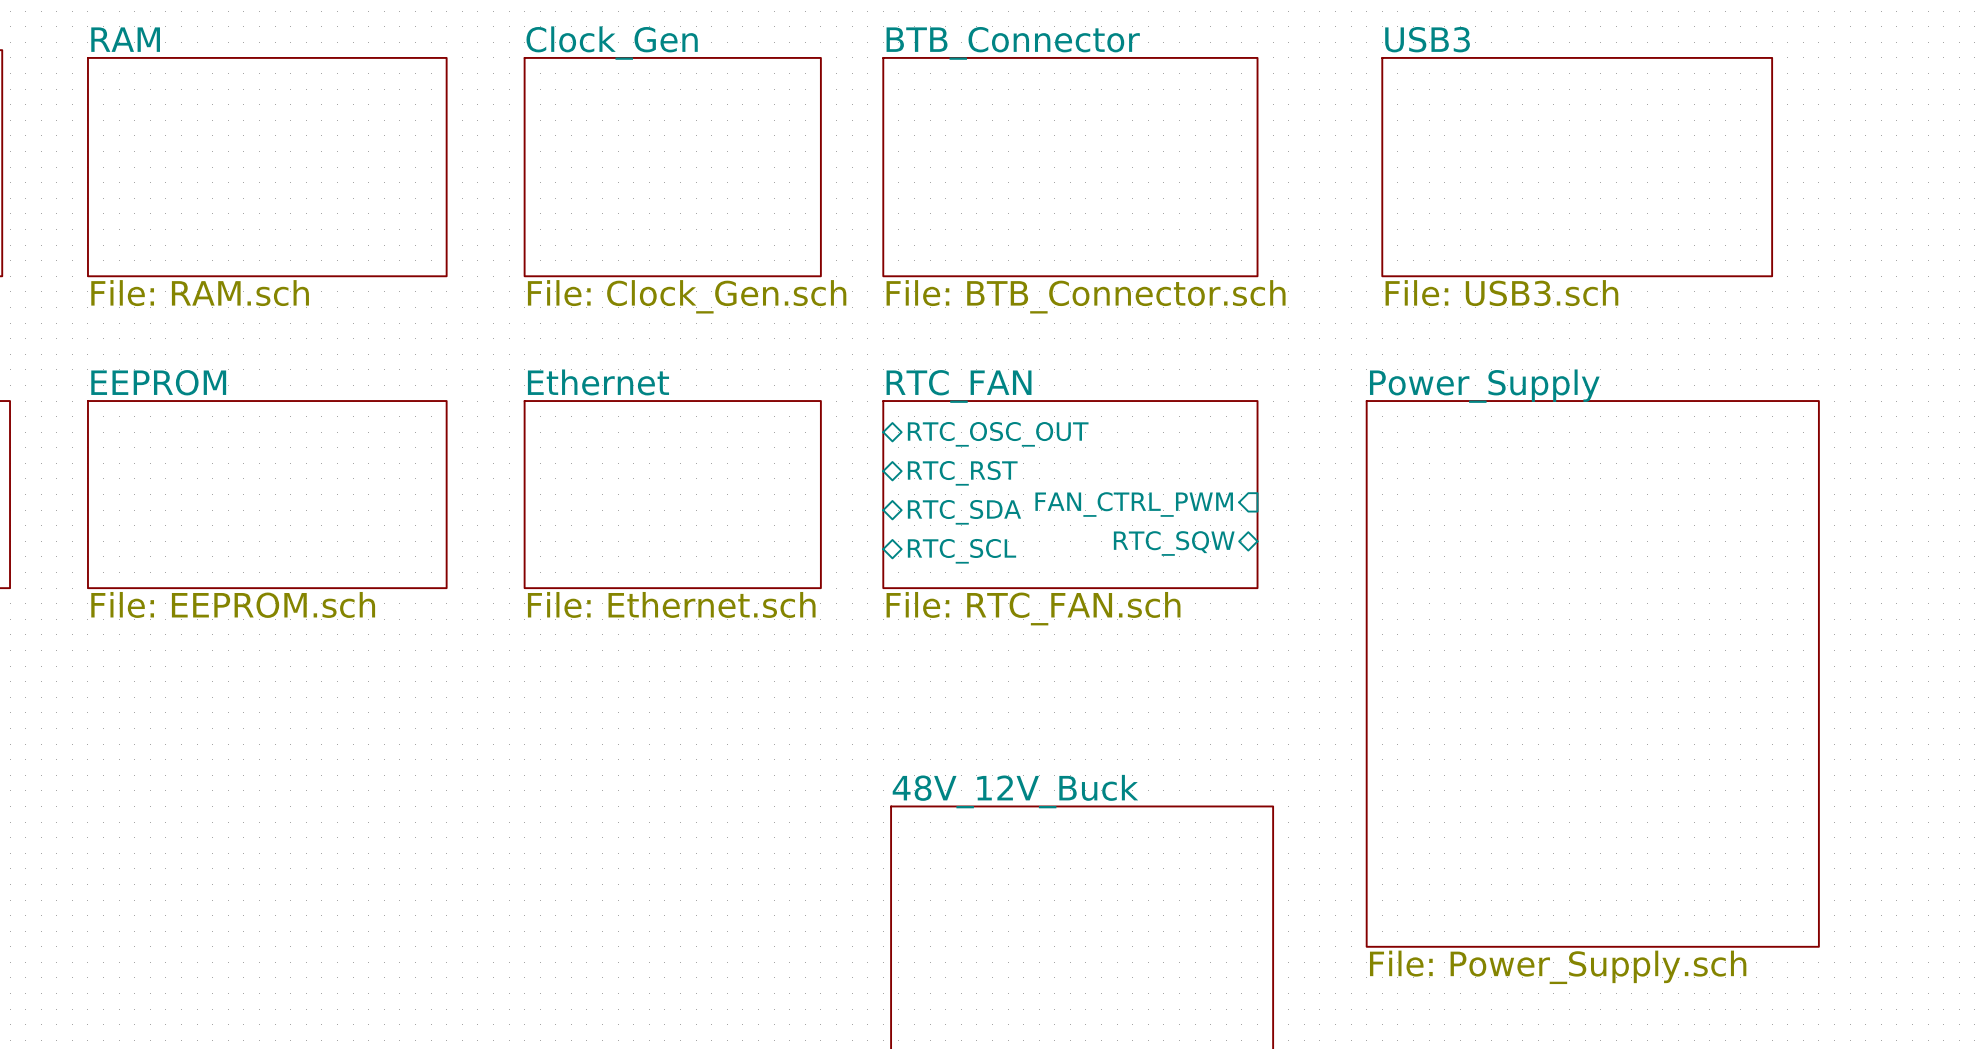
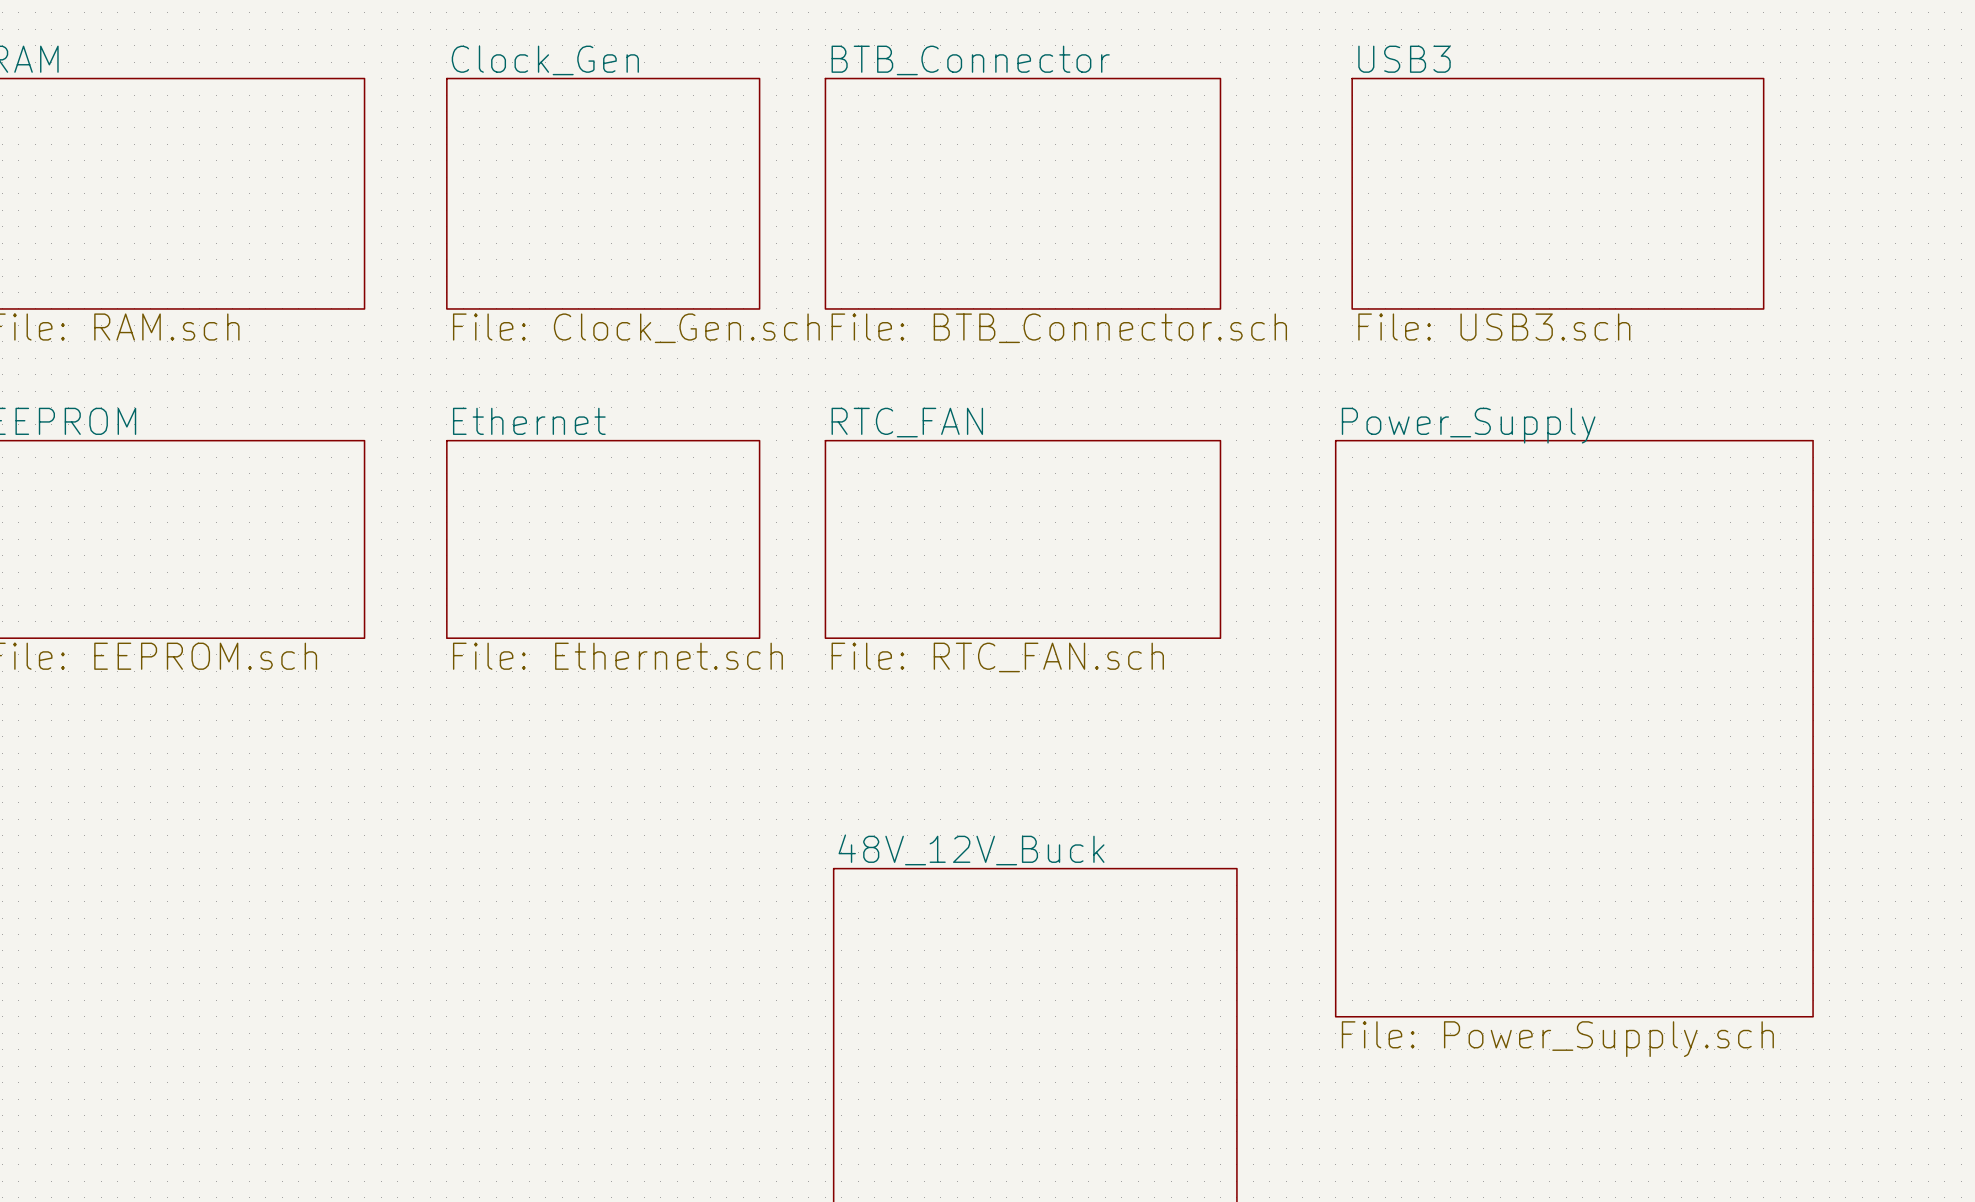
sheet pin: RTC_OSC_OUT (998, 434) -> none
sheet pin: RTC_RST (962, 473) -> none
sheet pin: FAN_CTRL_PWM (1134, 504) -> none
sheet pin: RTC_SDA (964, 512) -> none
sheet pin: RTC_SQW (1174, 543) -> none
sheet pin: RTC_SCL (961, 551) -> none

